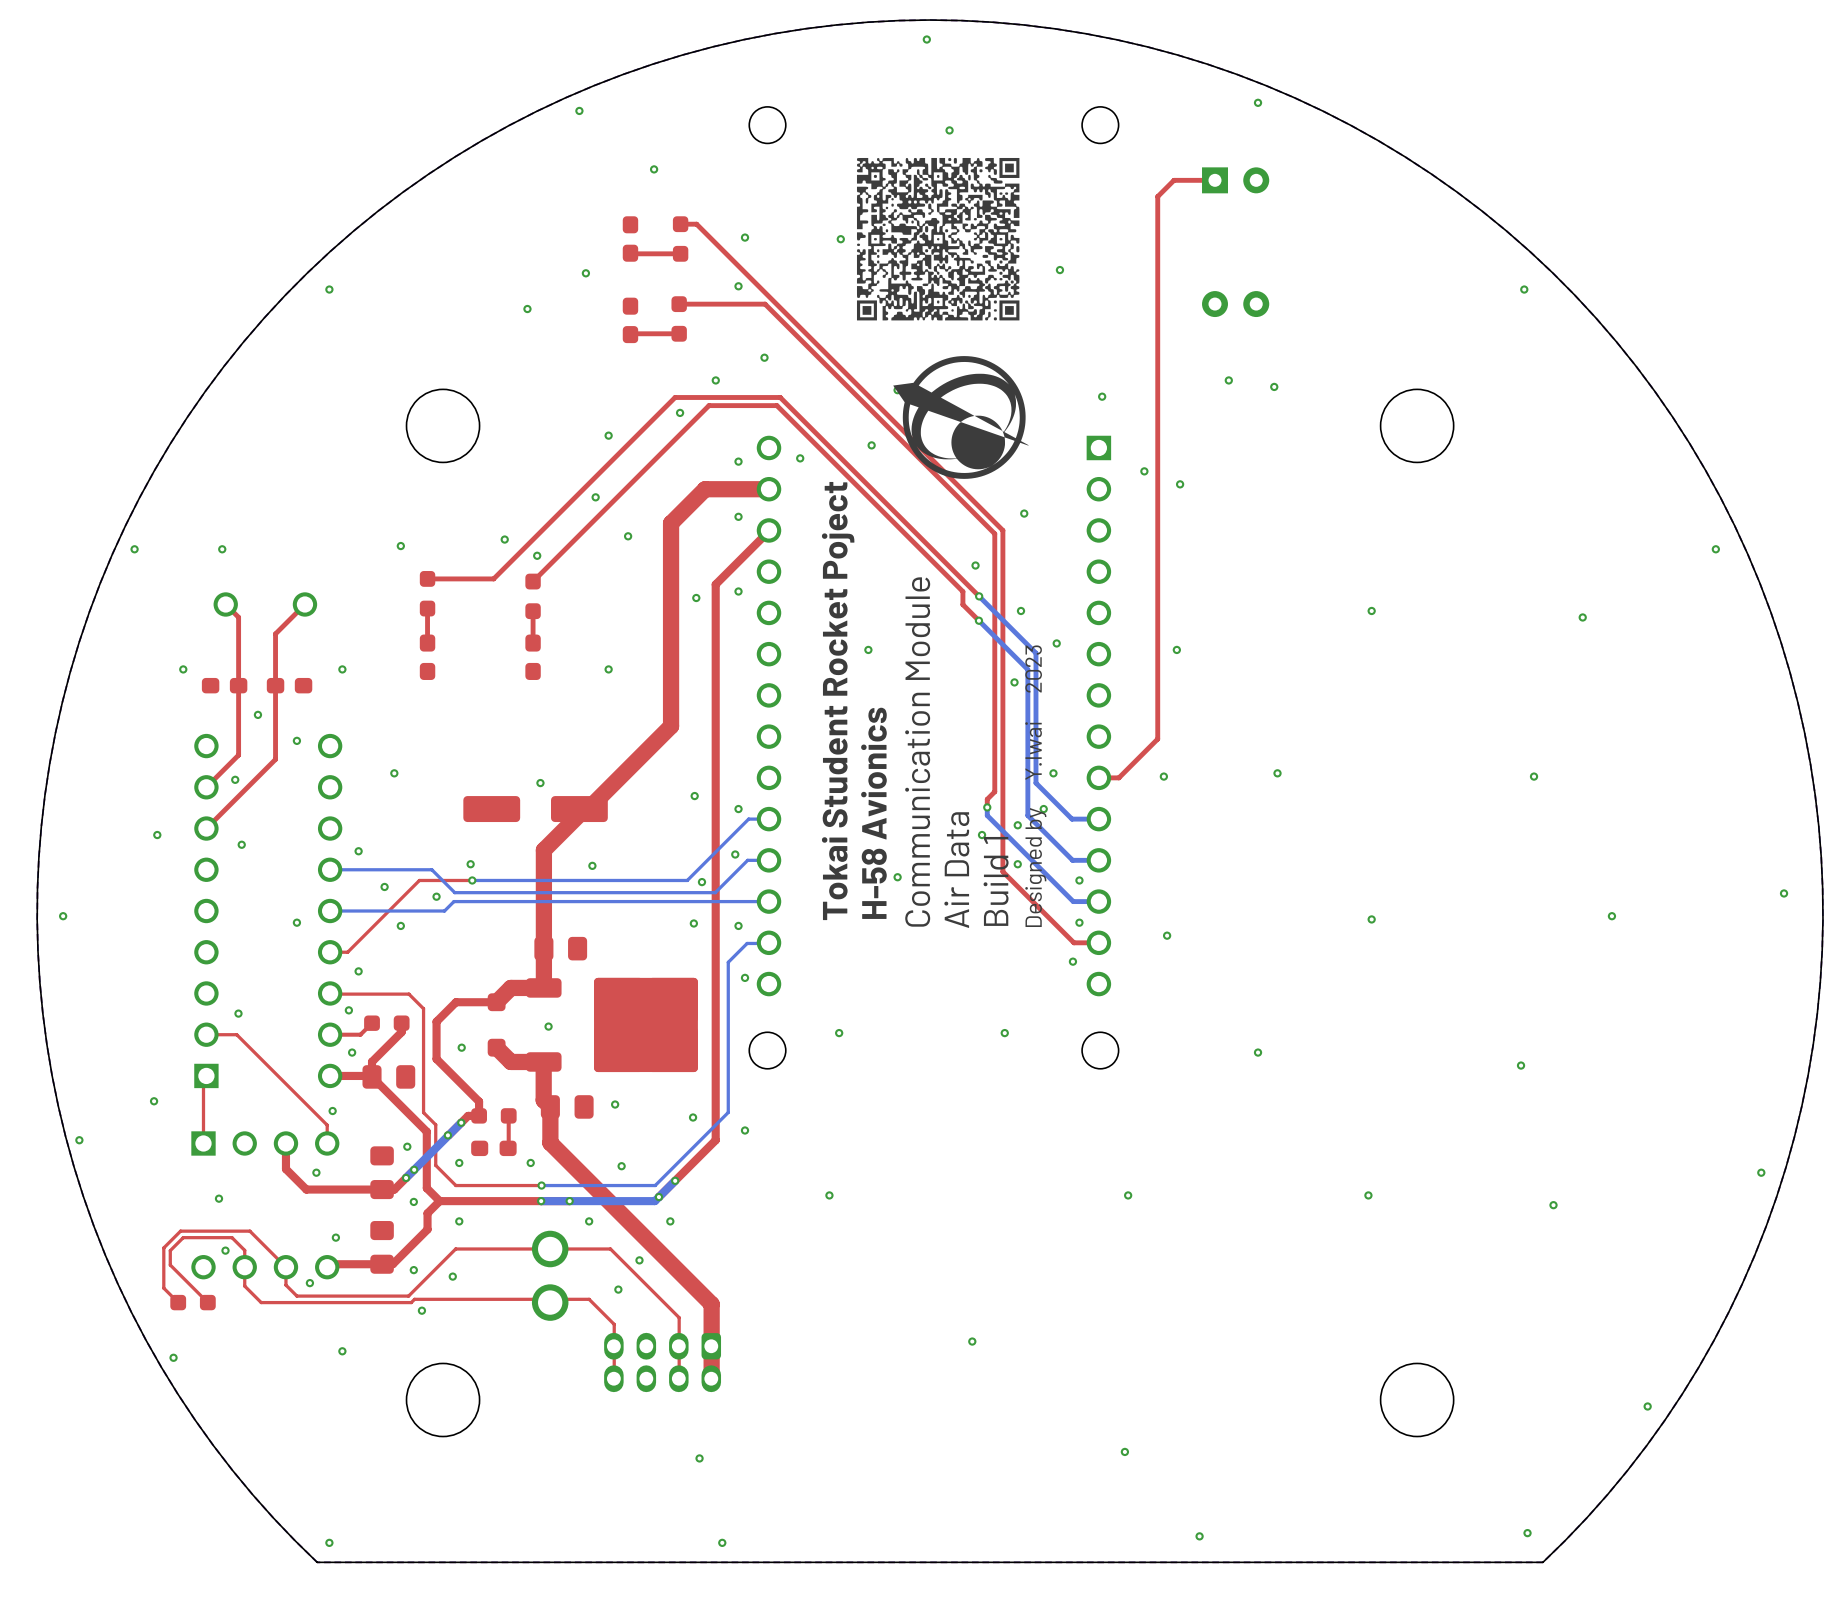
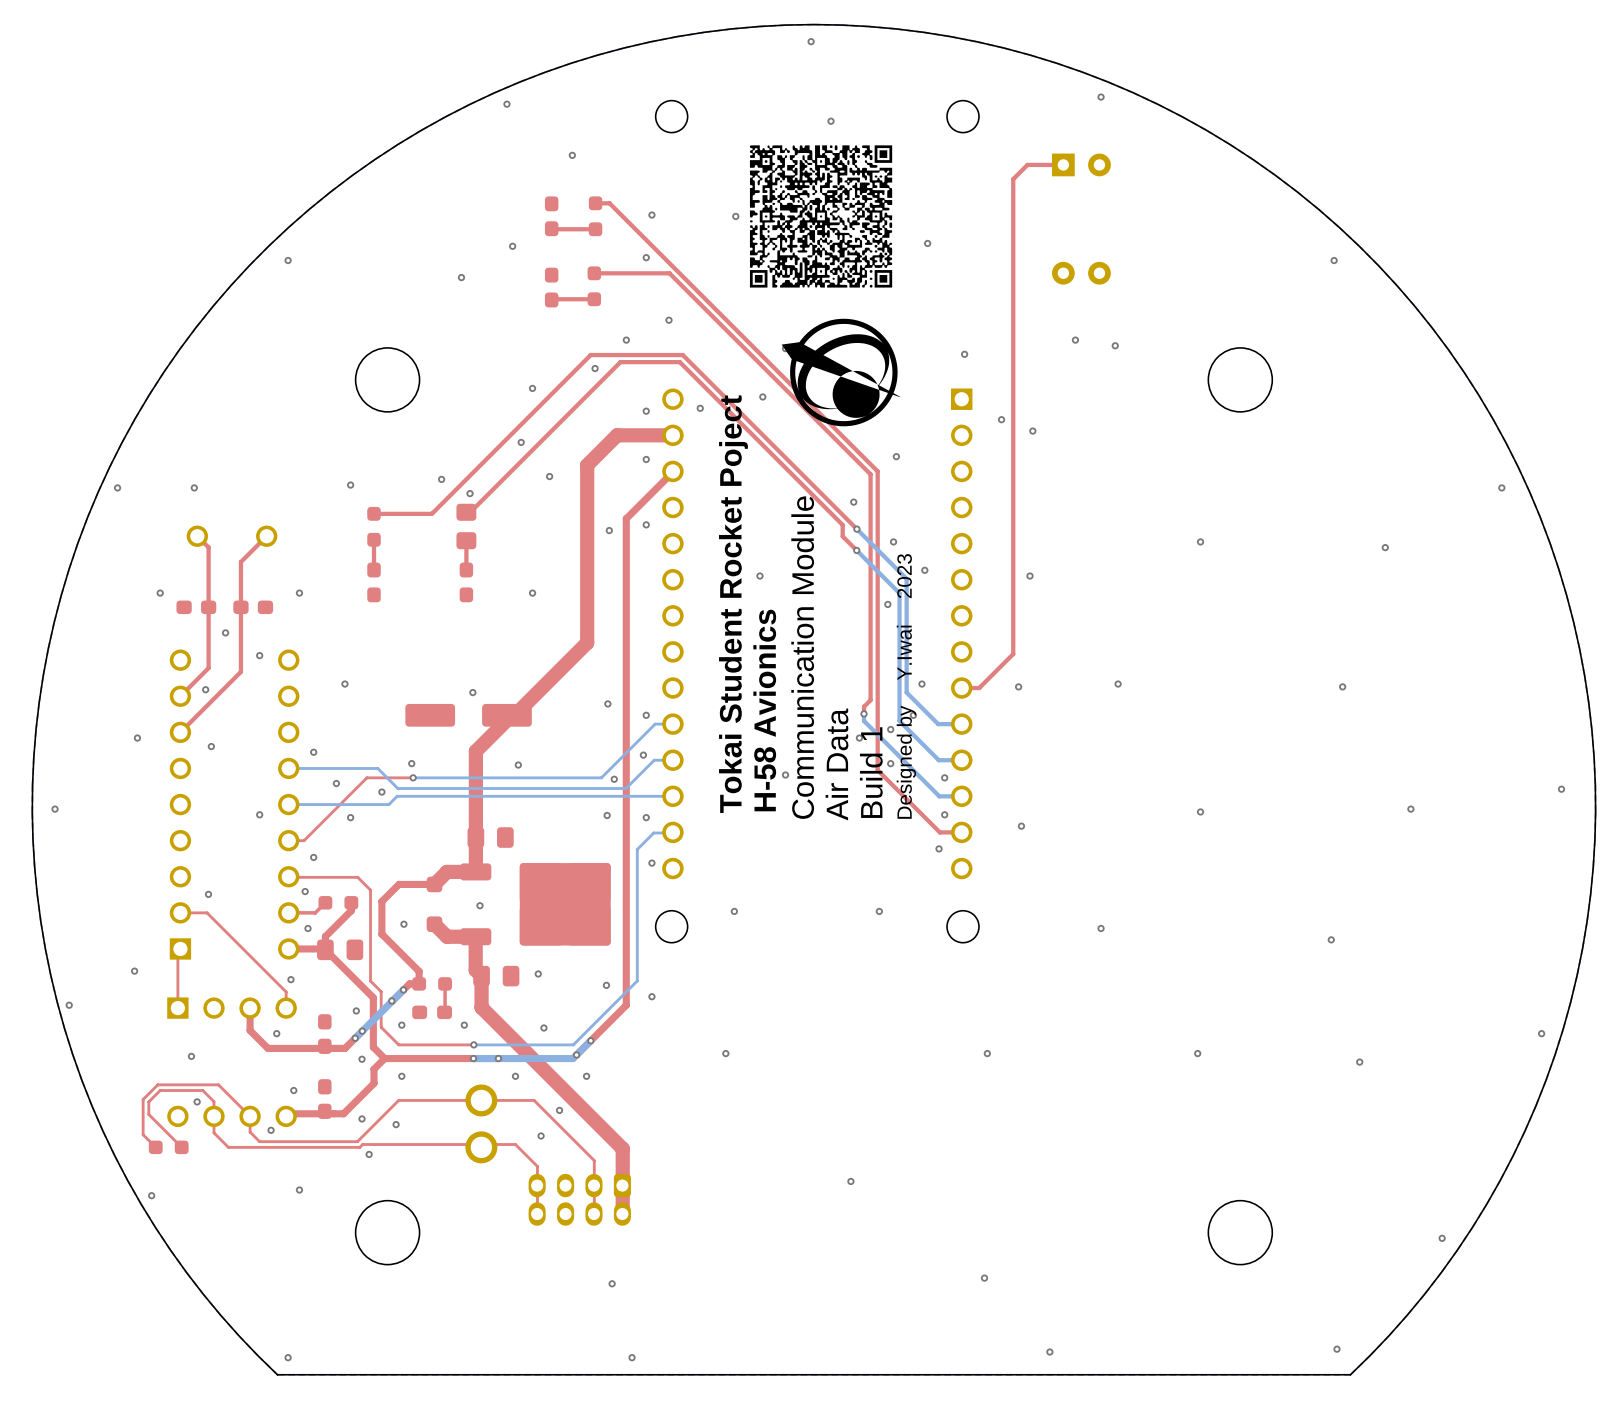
part footprint: [525, 573, 541, 620] -> [456, 503, 477, 550]
part footprint: [370, 1146, 394, 1200] -> [318, 1014, 332, 1054]
part footprint: [370, 1221, 394, 1274] -> [318, 1079, 332, 1119]

